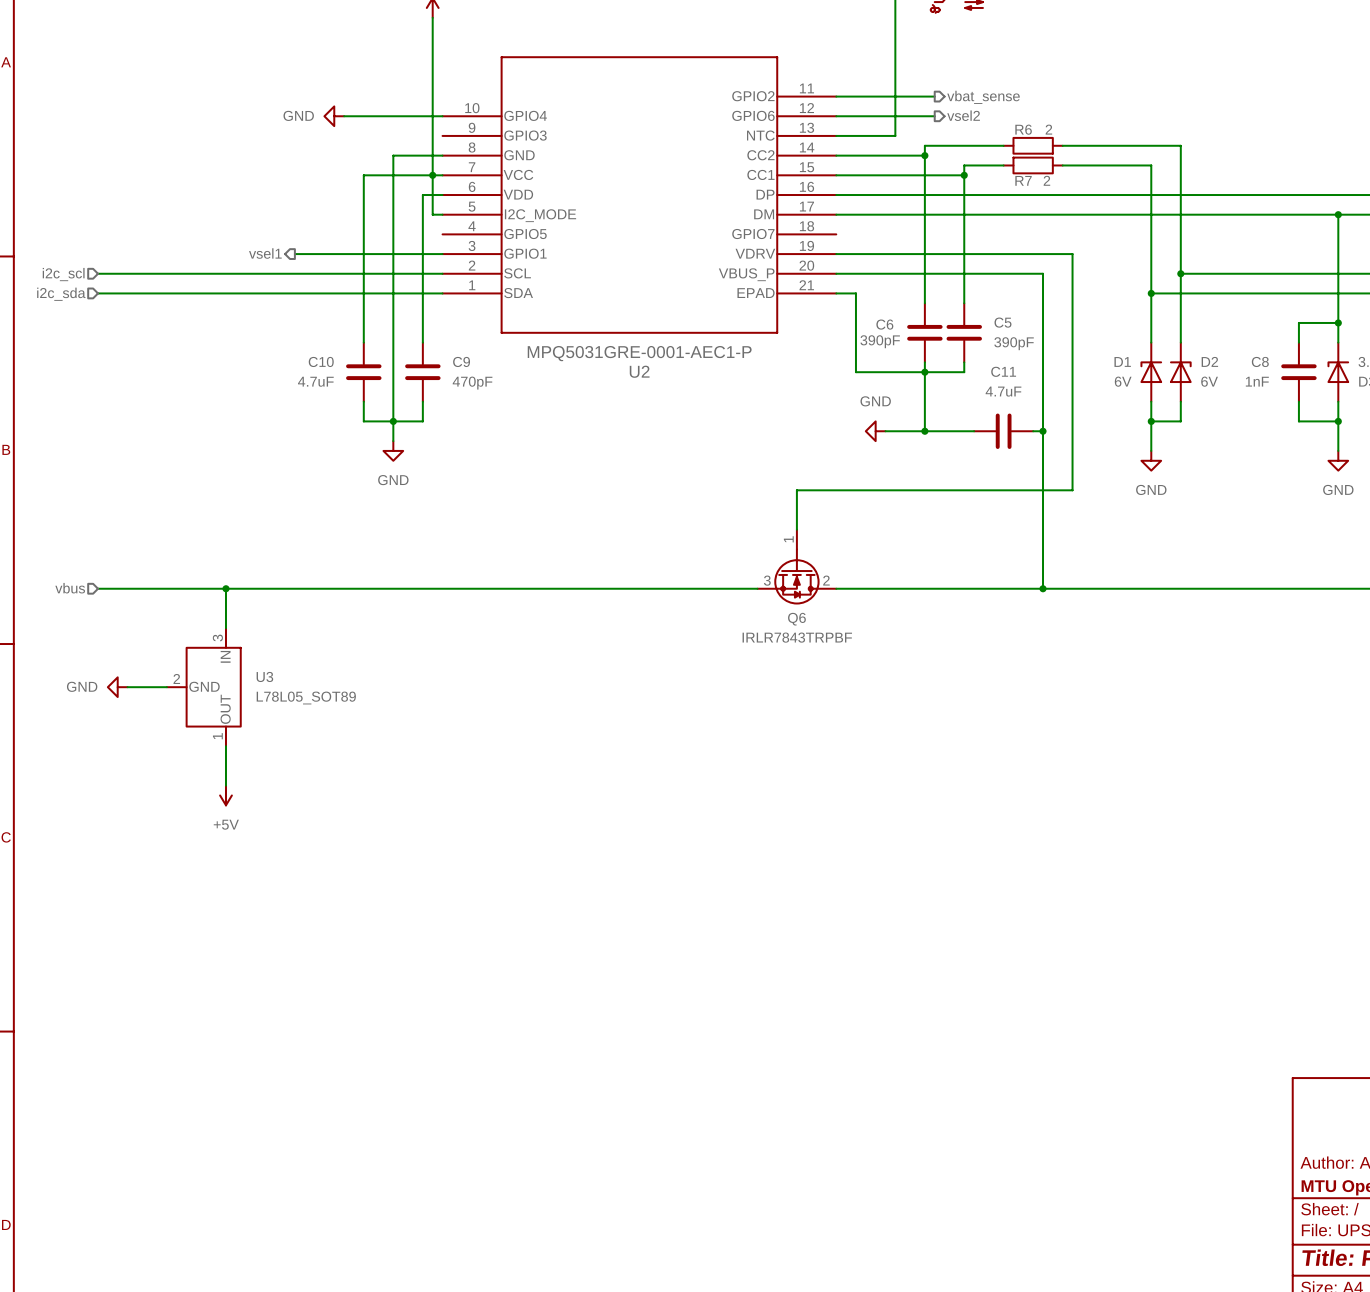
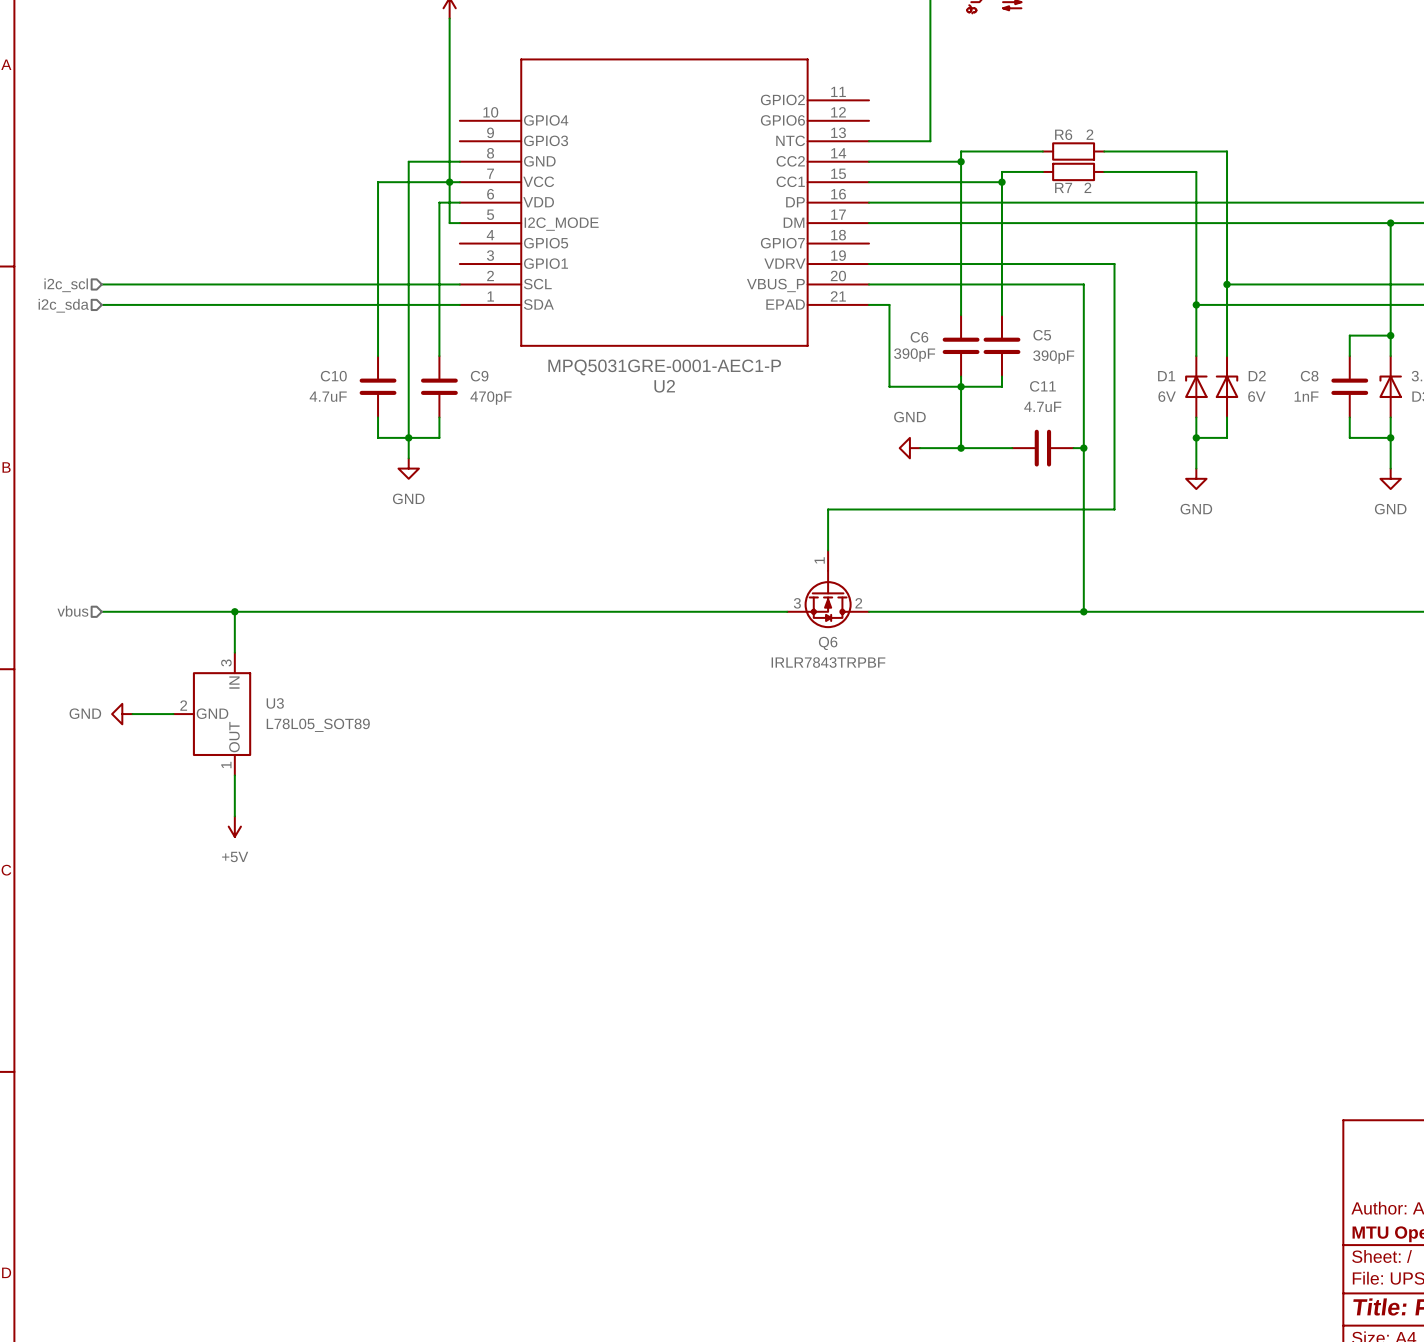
wire: (836, 96) (934, 96) -> none
hierarchical label: vbat_sense (983, 97) -> none
hierarchical label: vsel2 (963, 115) -> none
power symbol: GND (334, 116) -> none
wire: (344, 116) (442, 116) -> none
wire: (836, 116) (934, 116) -> none
hierarchical label: vsel1 (265, 253) -> none
wire: (294, 254) (442, 254) -> none

